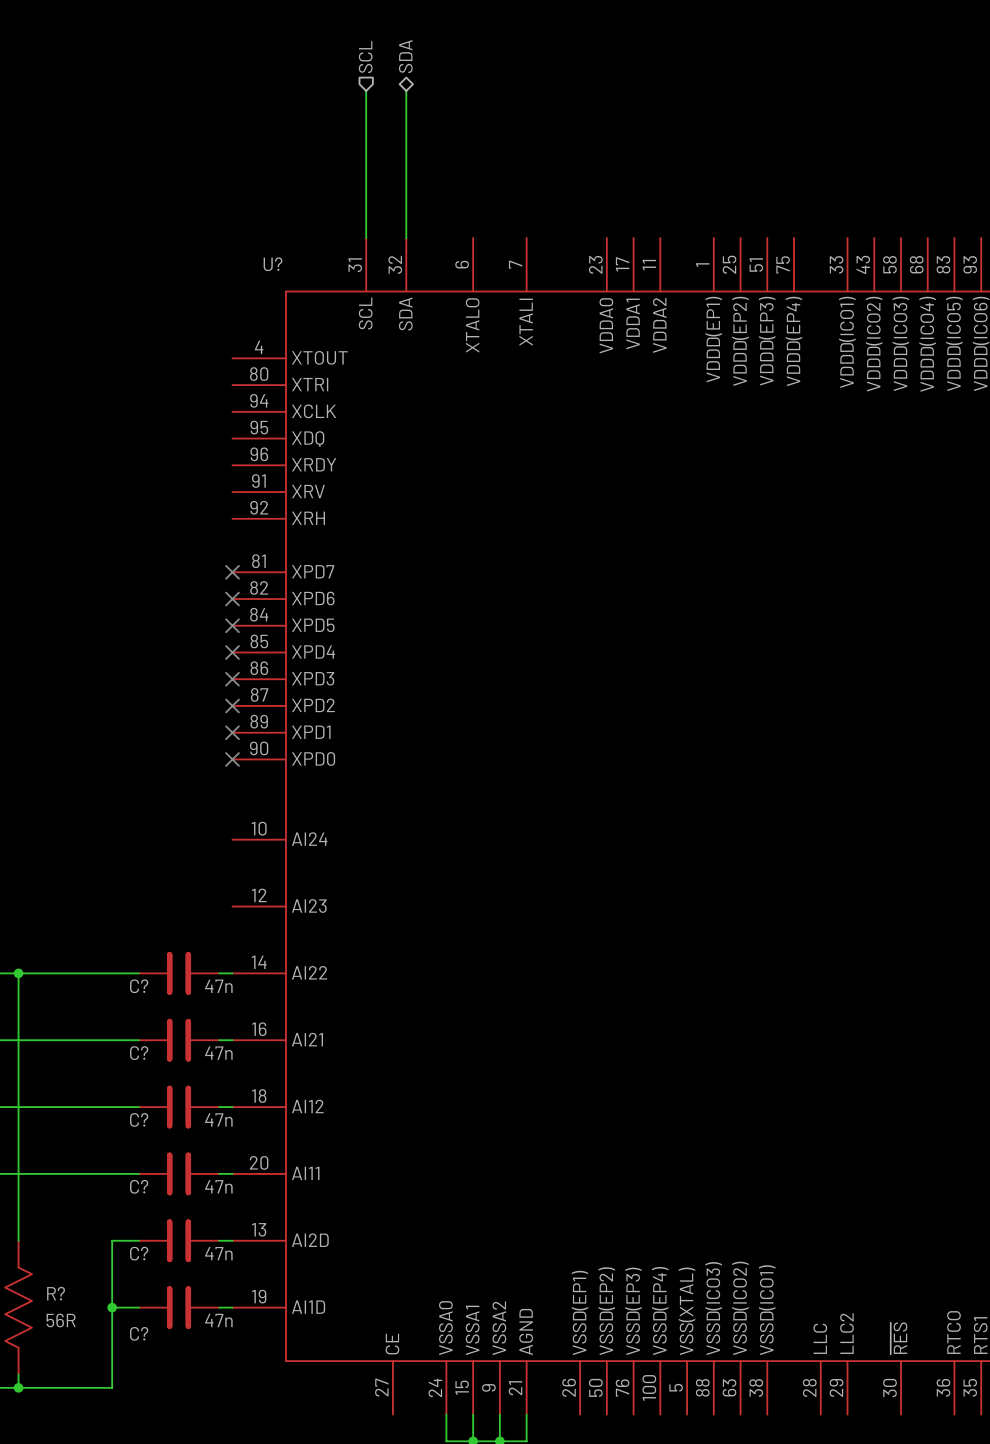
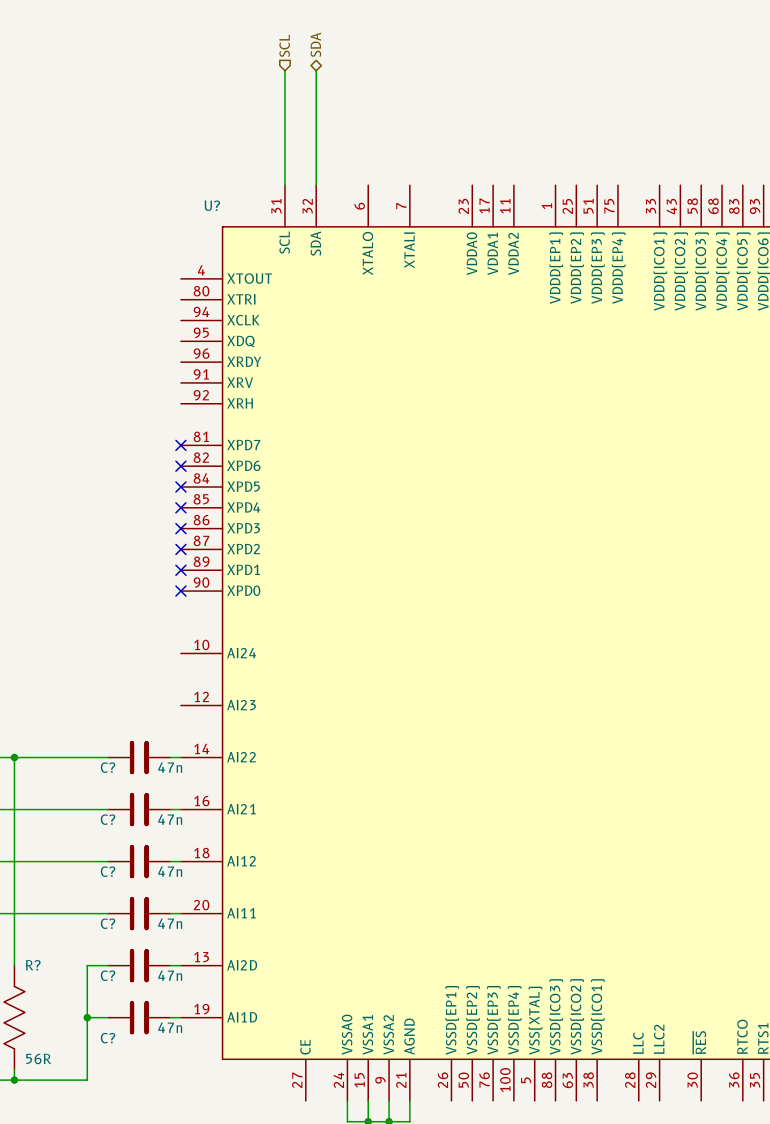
R? name position: R? (56, 1293) -> R? (33, 965)
R? value position: 56R (61, 1320) -> 56R (38, 1058)

